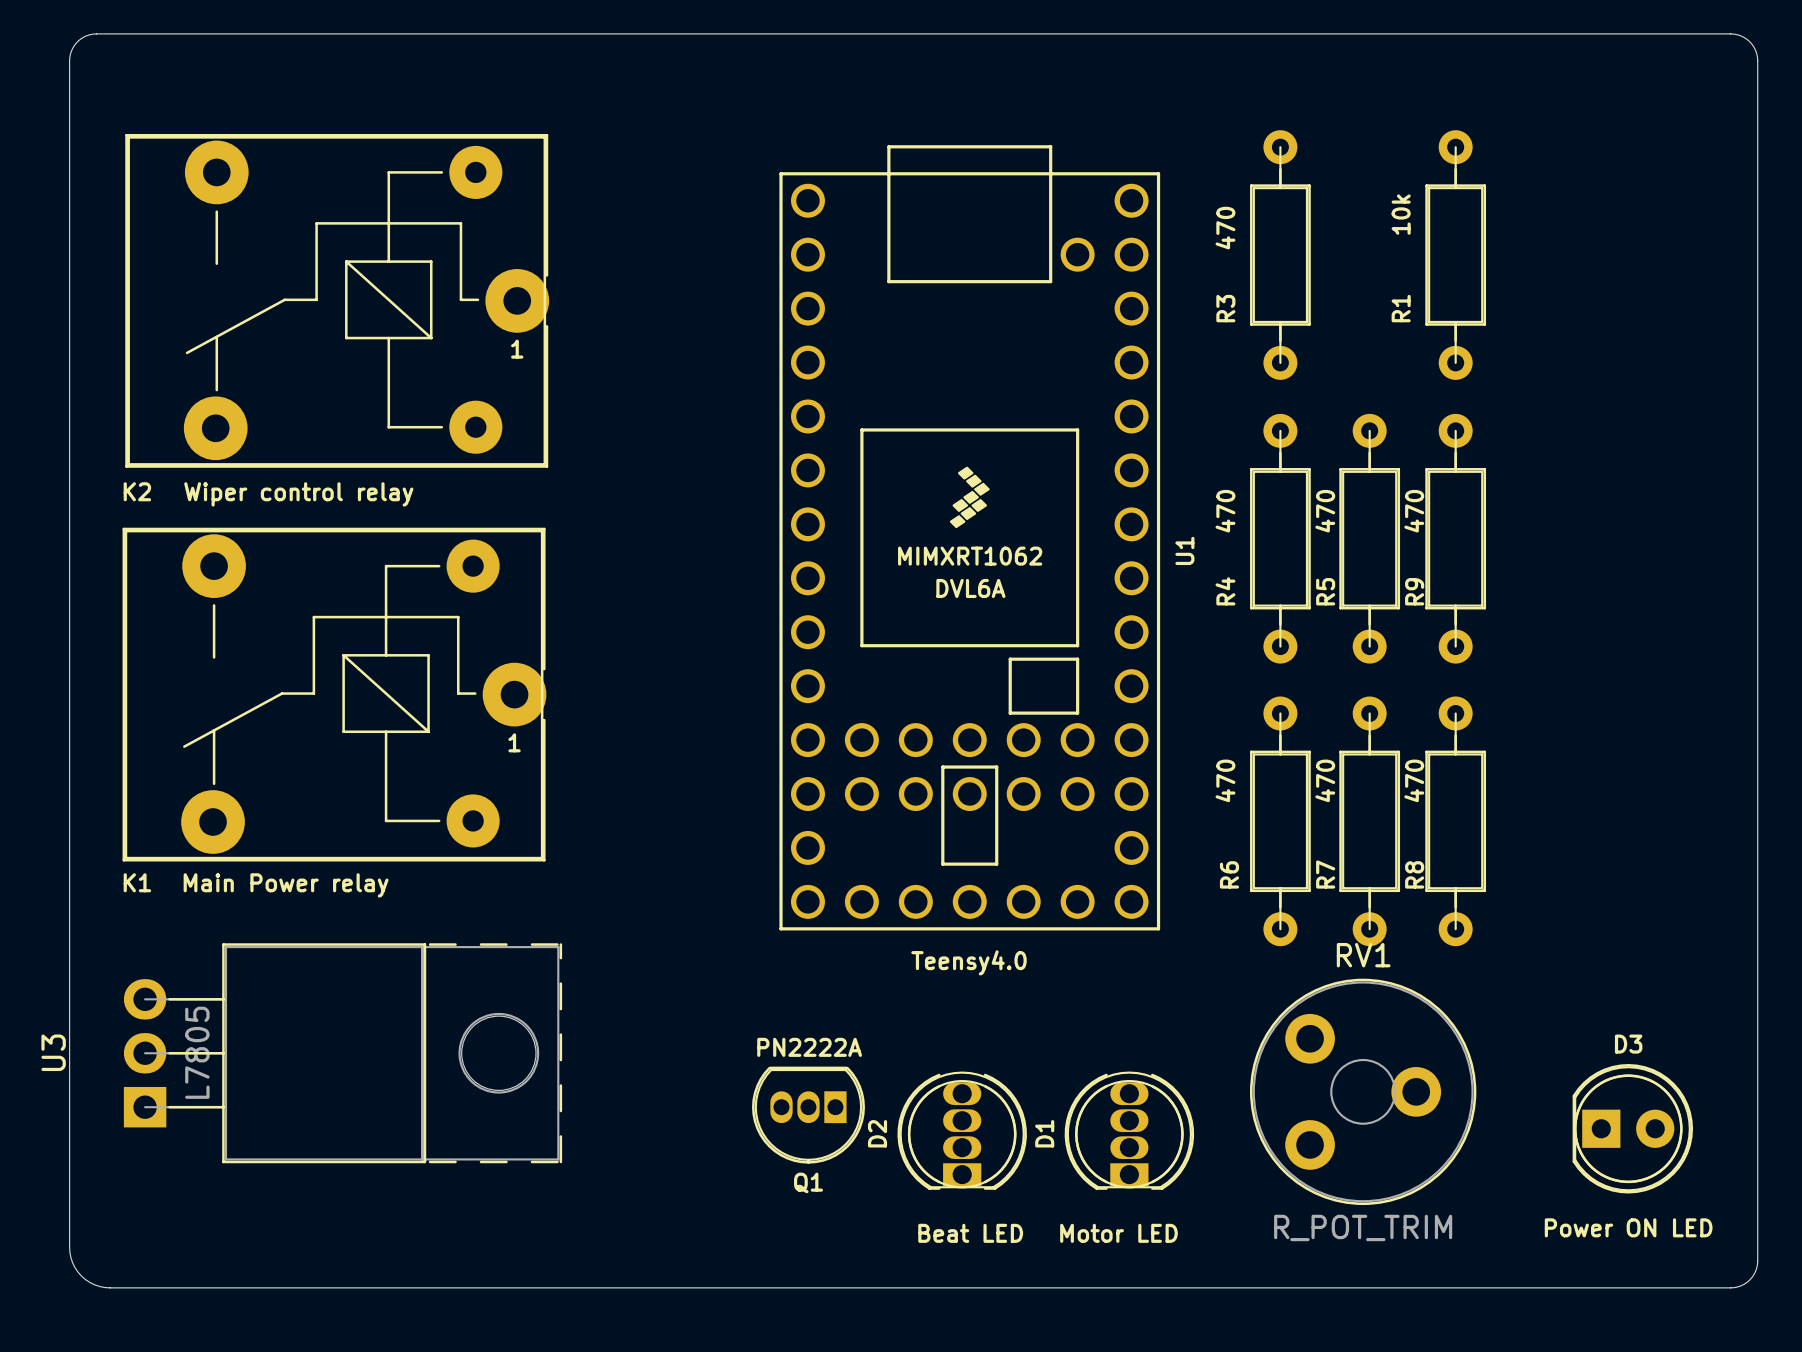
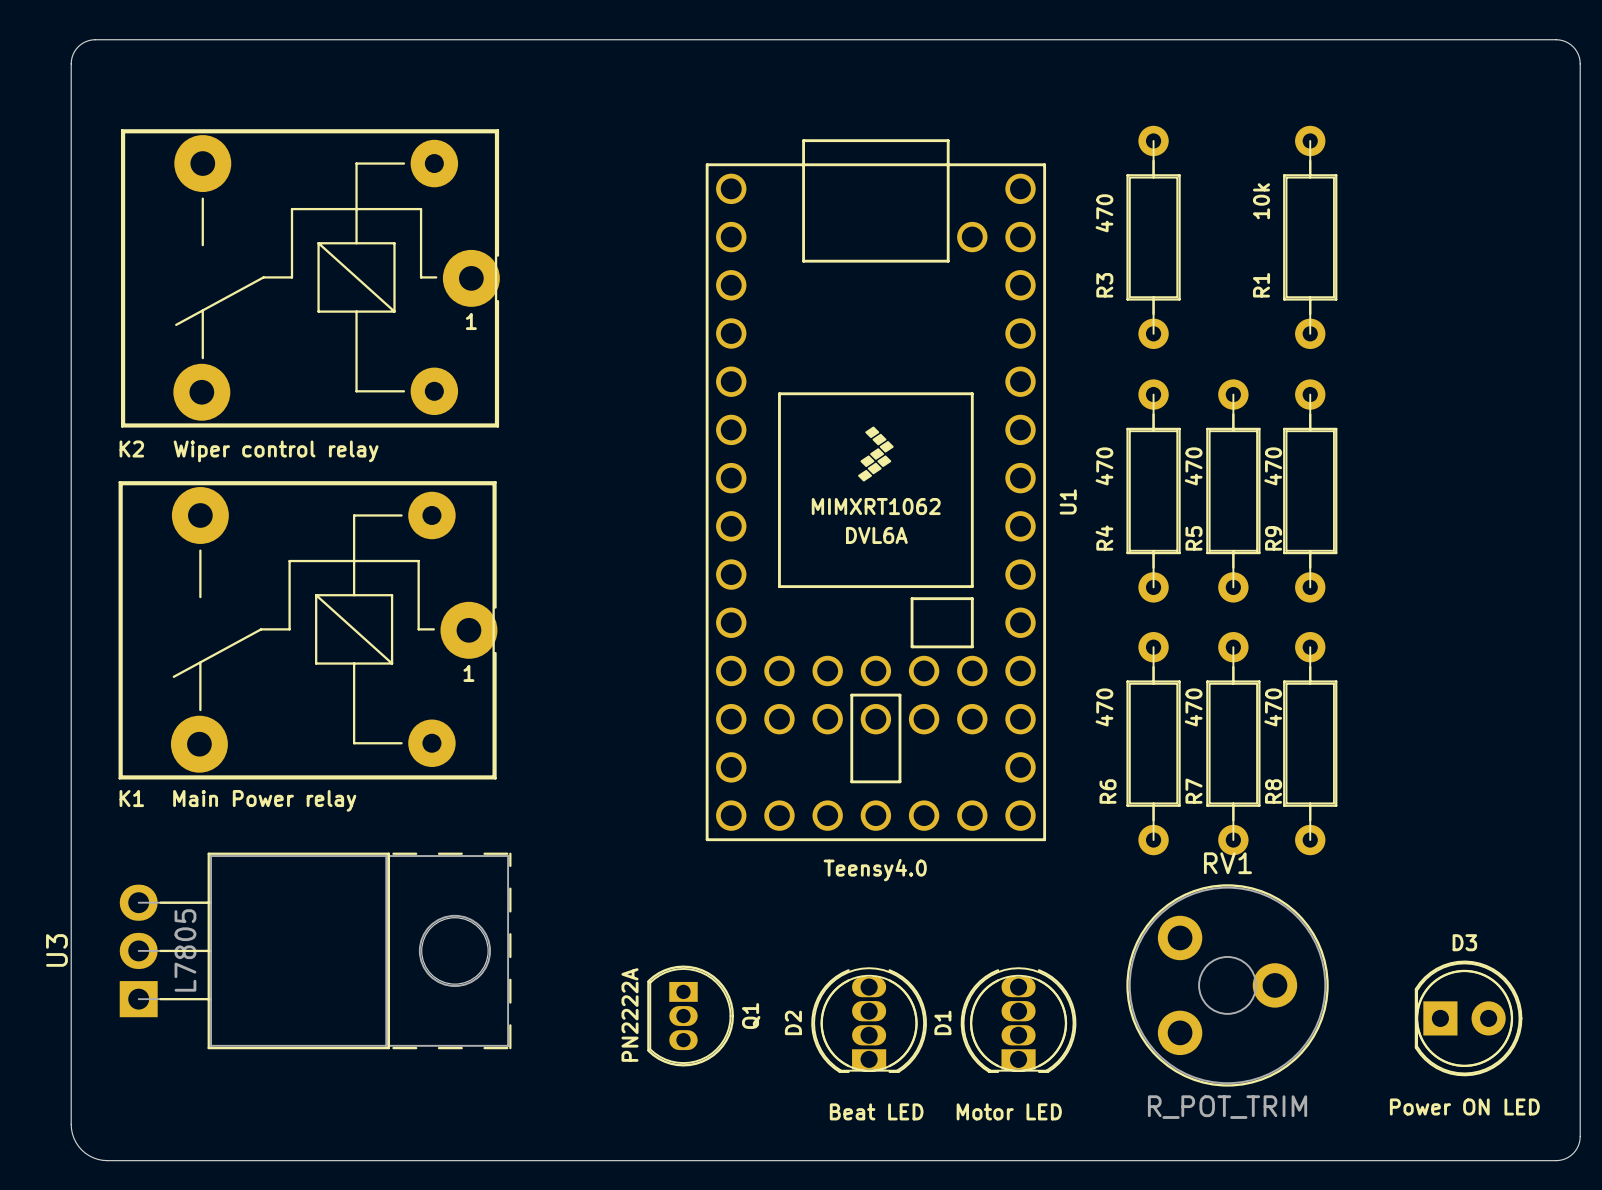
Q1 rotation: 0° (808, 1115) -> 90° counterclockwise (690, 1016)

